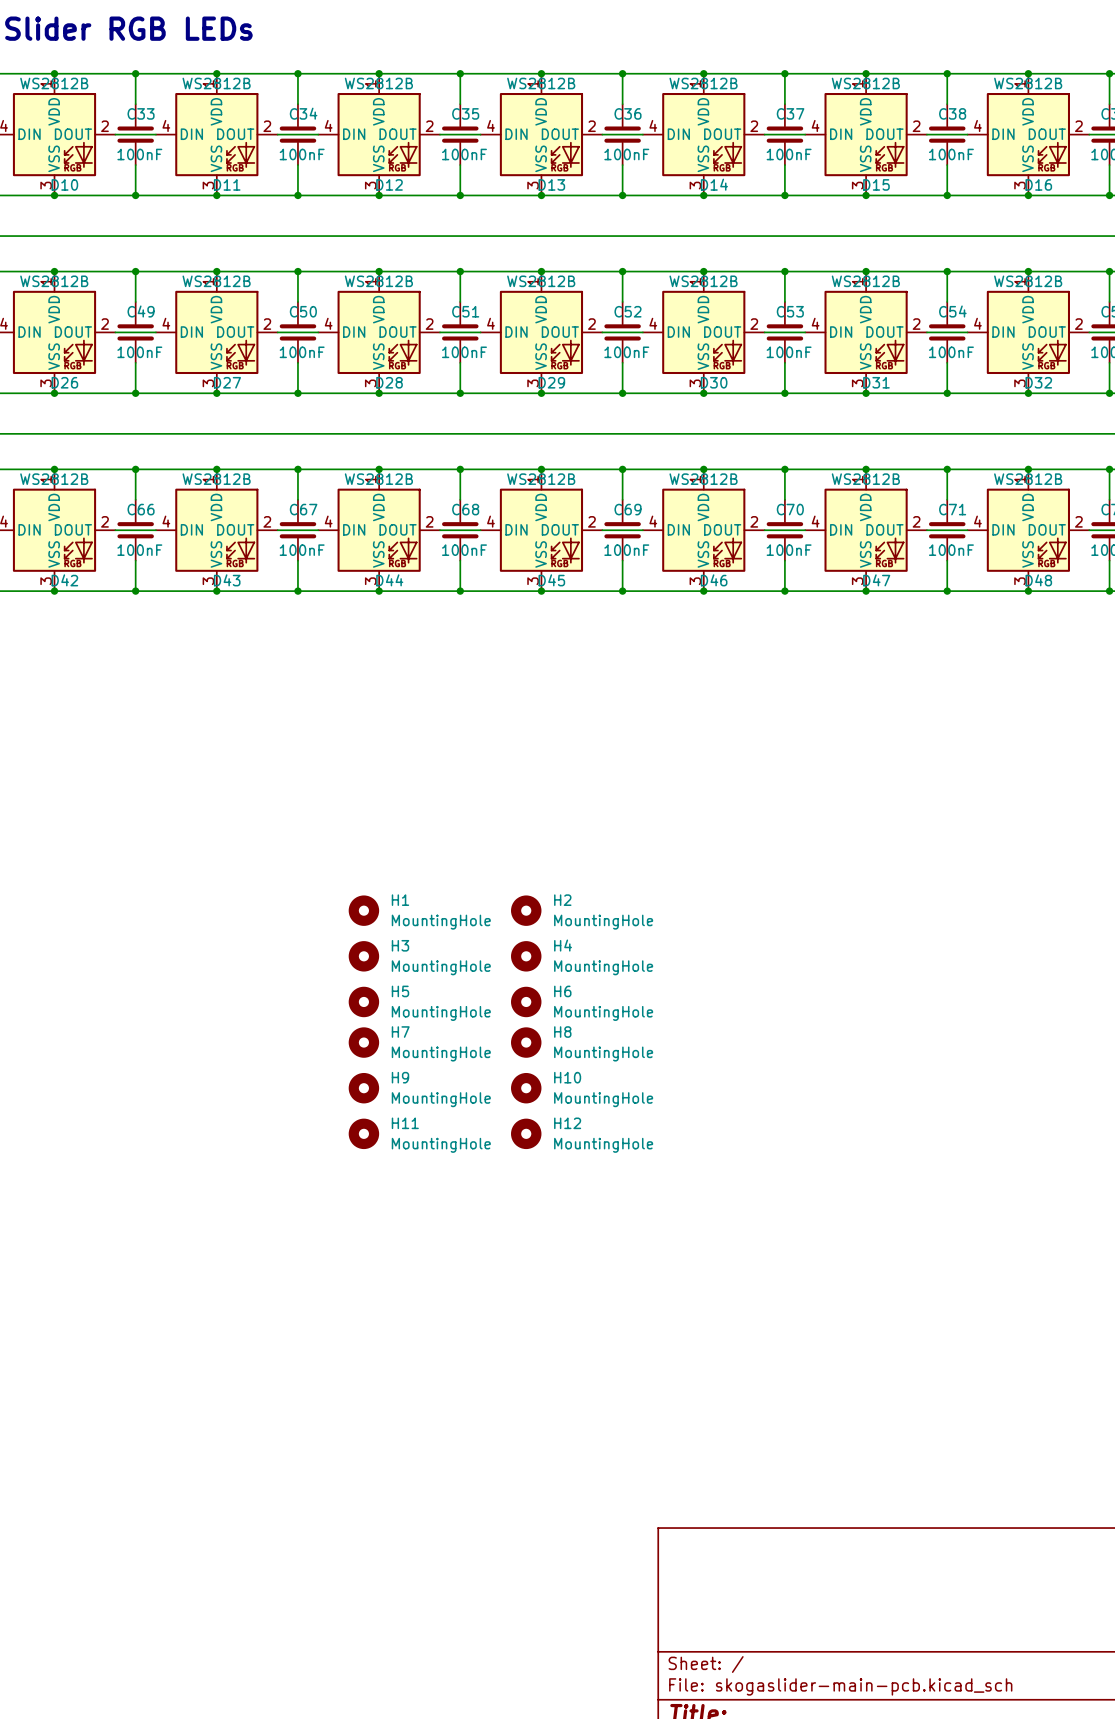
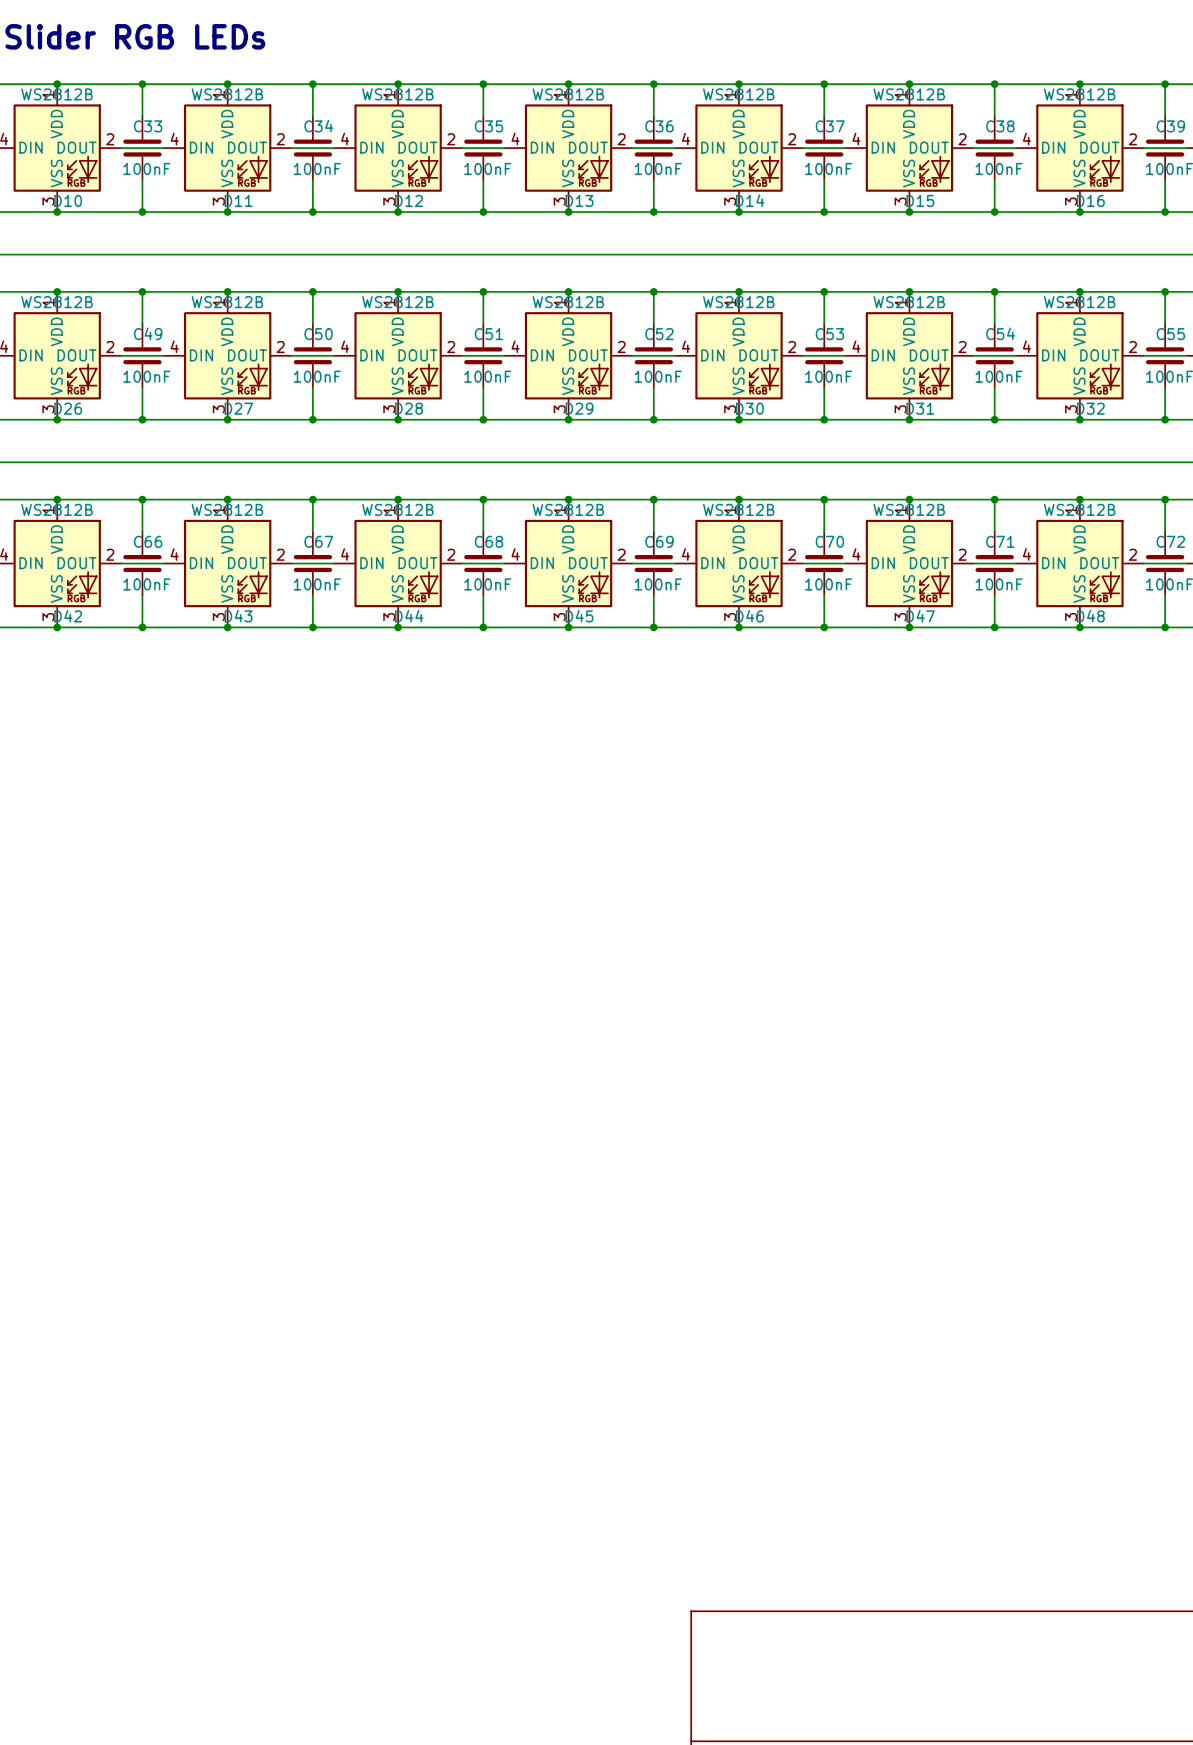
H1: MountingHole (363, 910) -> none
H2: MountingHole (526, 910) -> none
H3: MountingHole (363, 956) -> none
H4: MountingHole (526, 956) -> none
H5: MountingHole (363, 1001) -> none
H6: MountingHole (526, 1001) -> none
H7: MountingHole (363, 1042) -> none
H8: MountingHole (526, 1042) -> none
H9: MountingHole (363, 1088) -> none
H10: MountingHole (526, 1088) -> none
H11: MountingHole (363, 1133) -> none
H12: MountingHole (526, 1133) -> none

